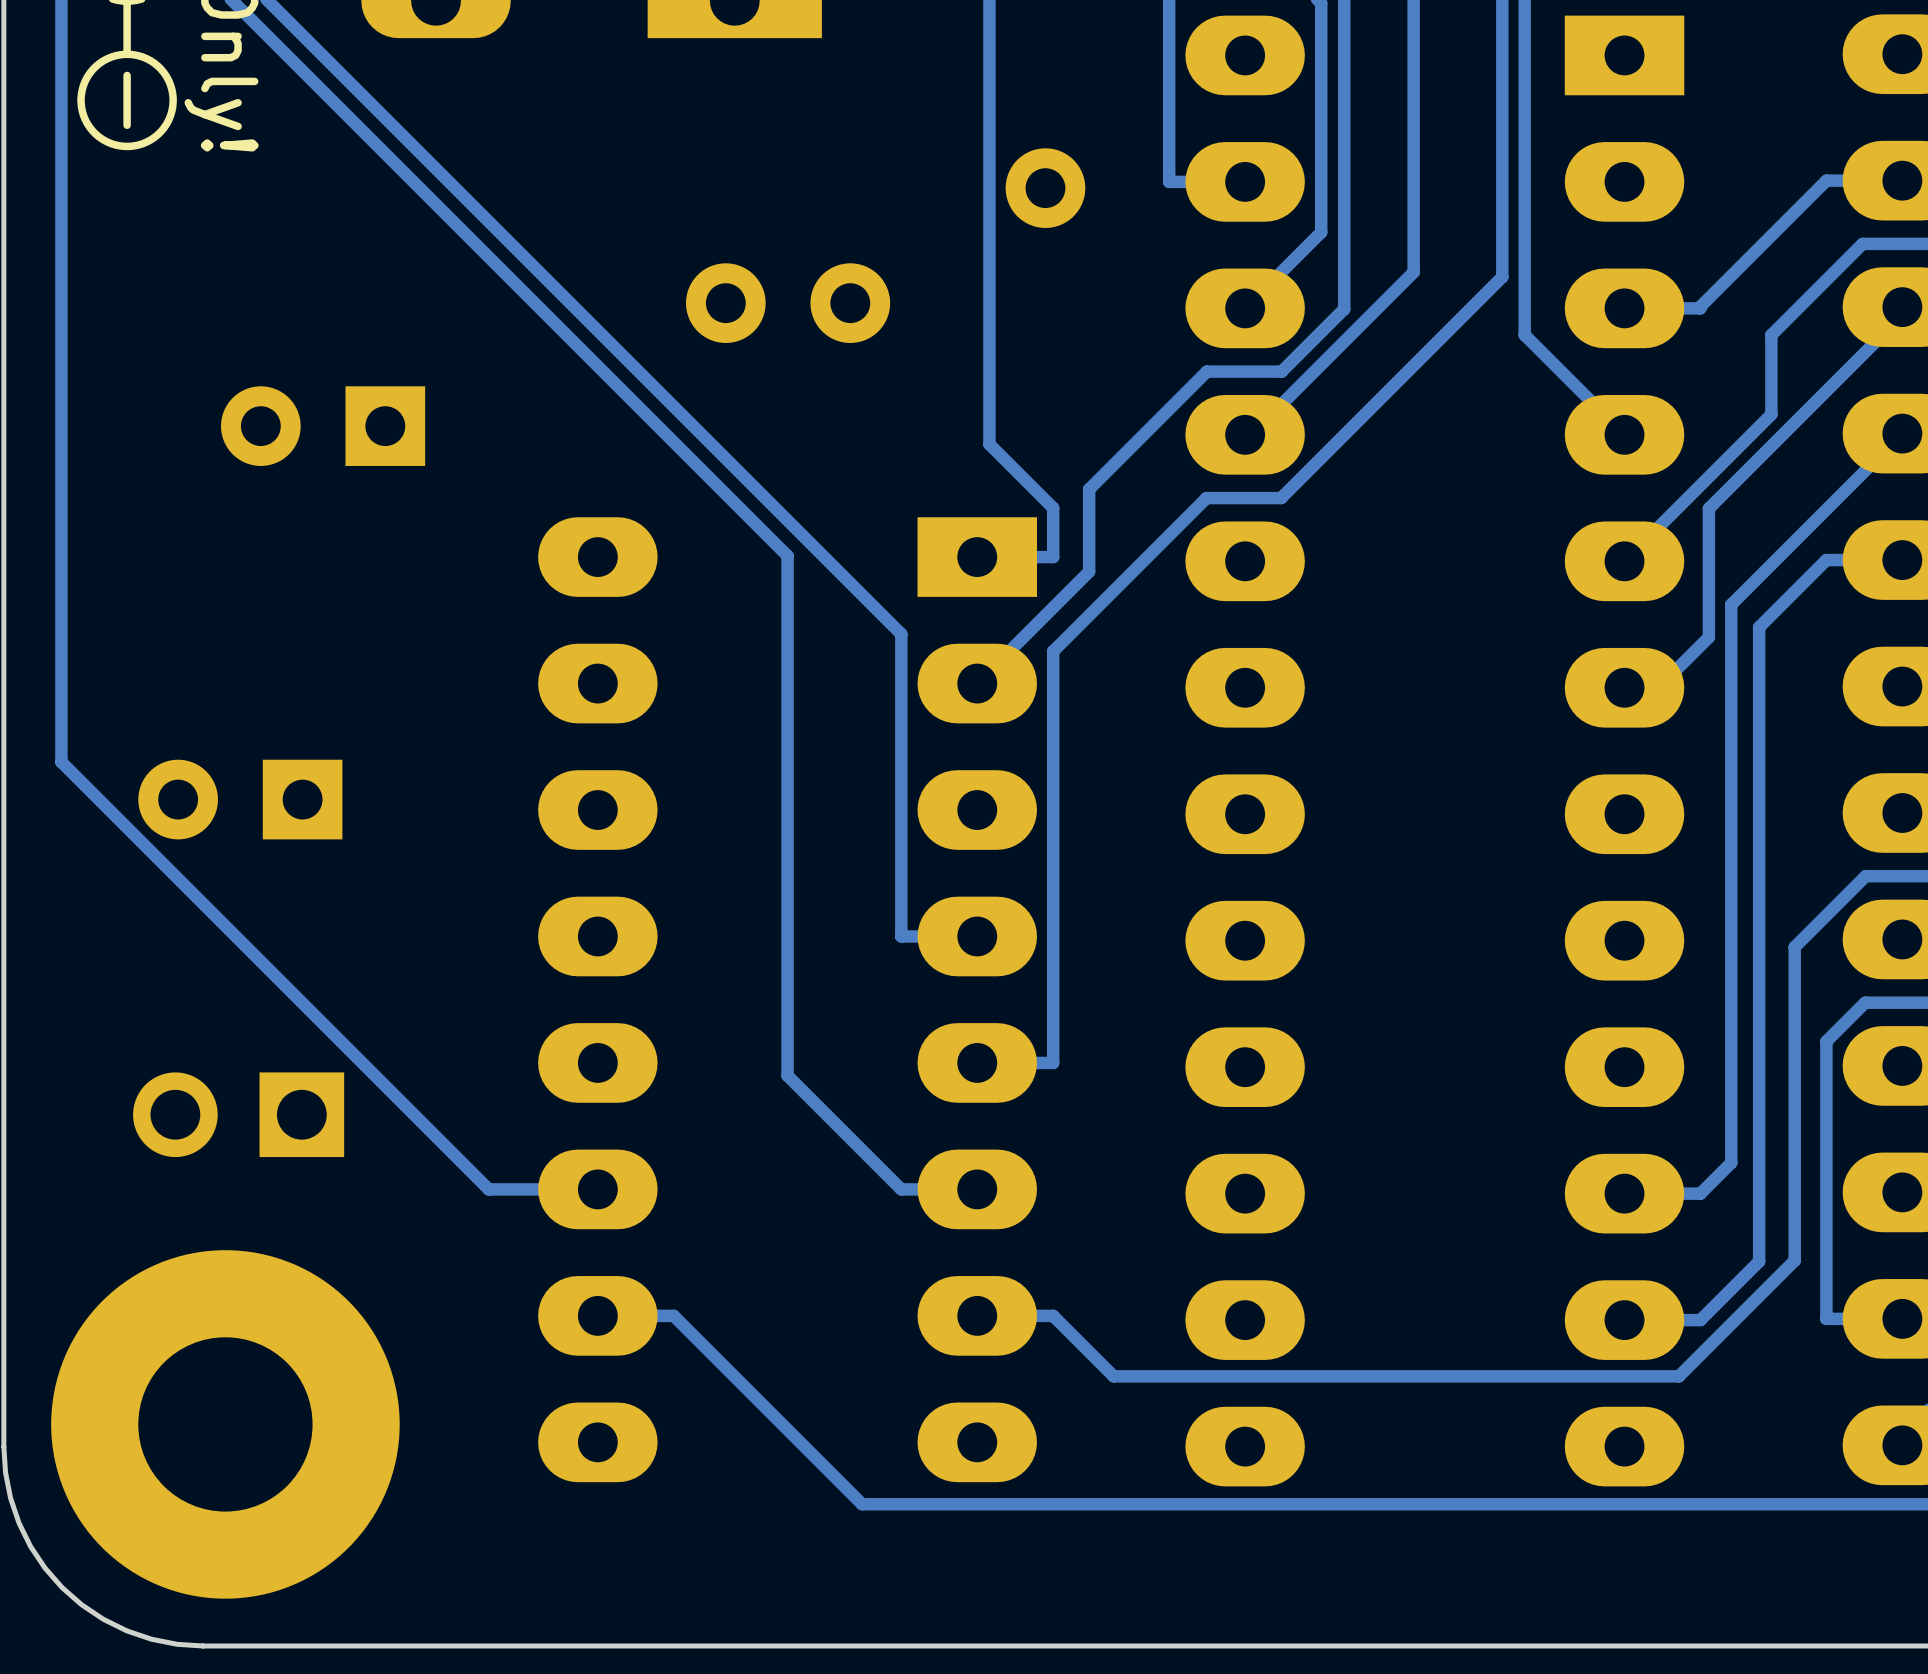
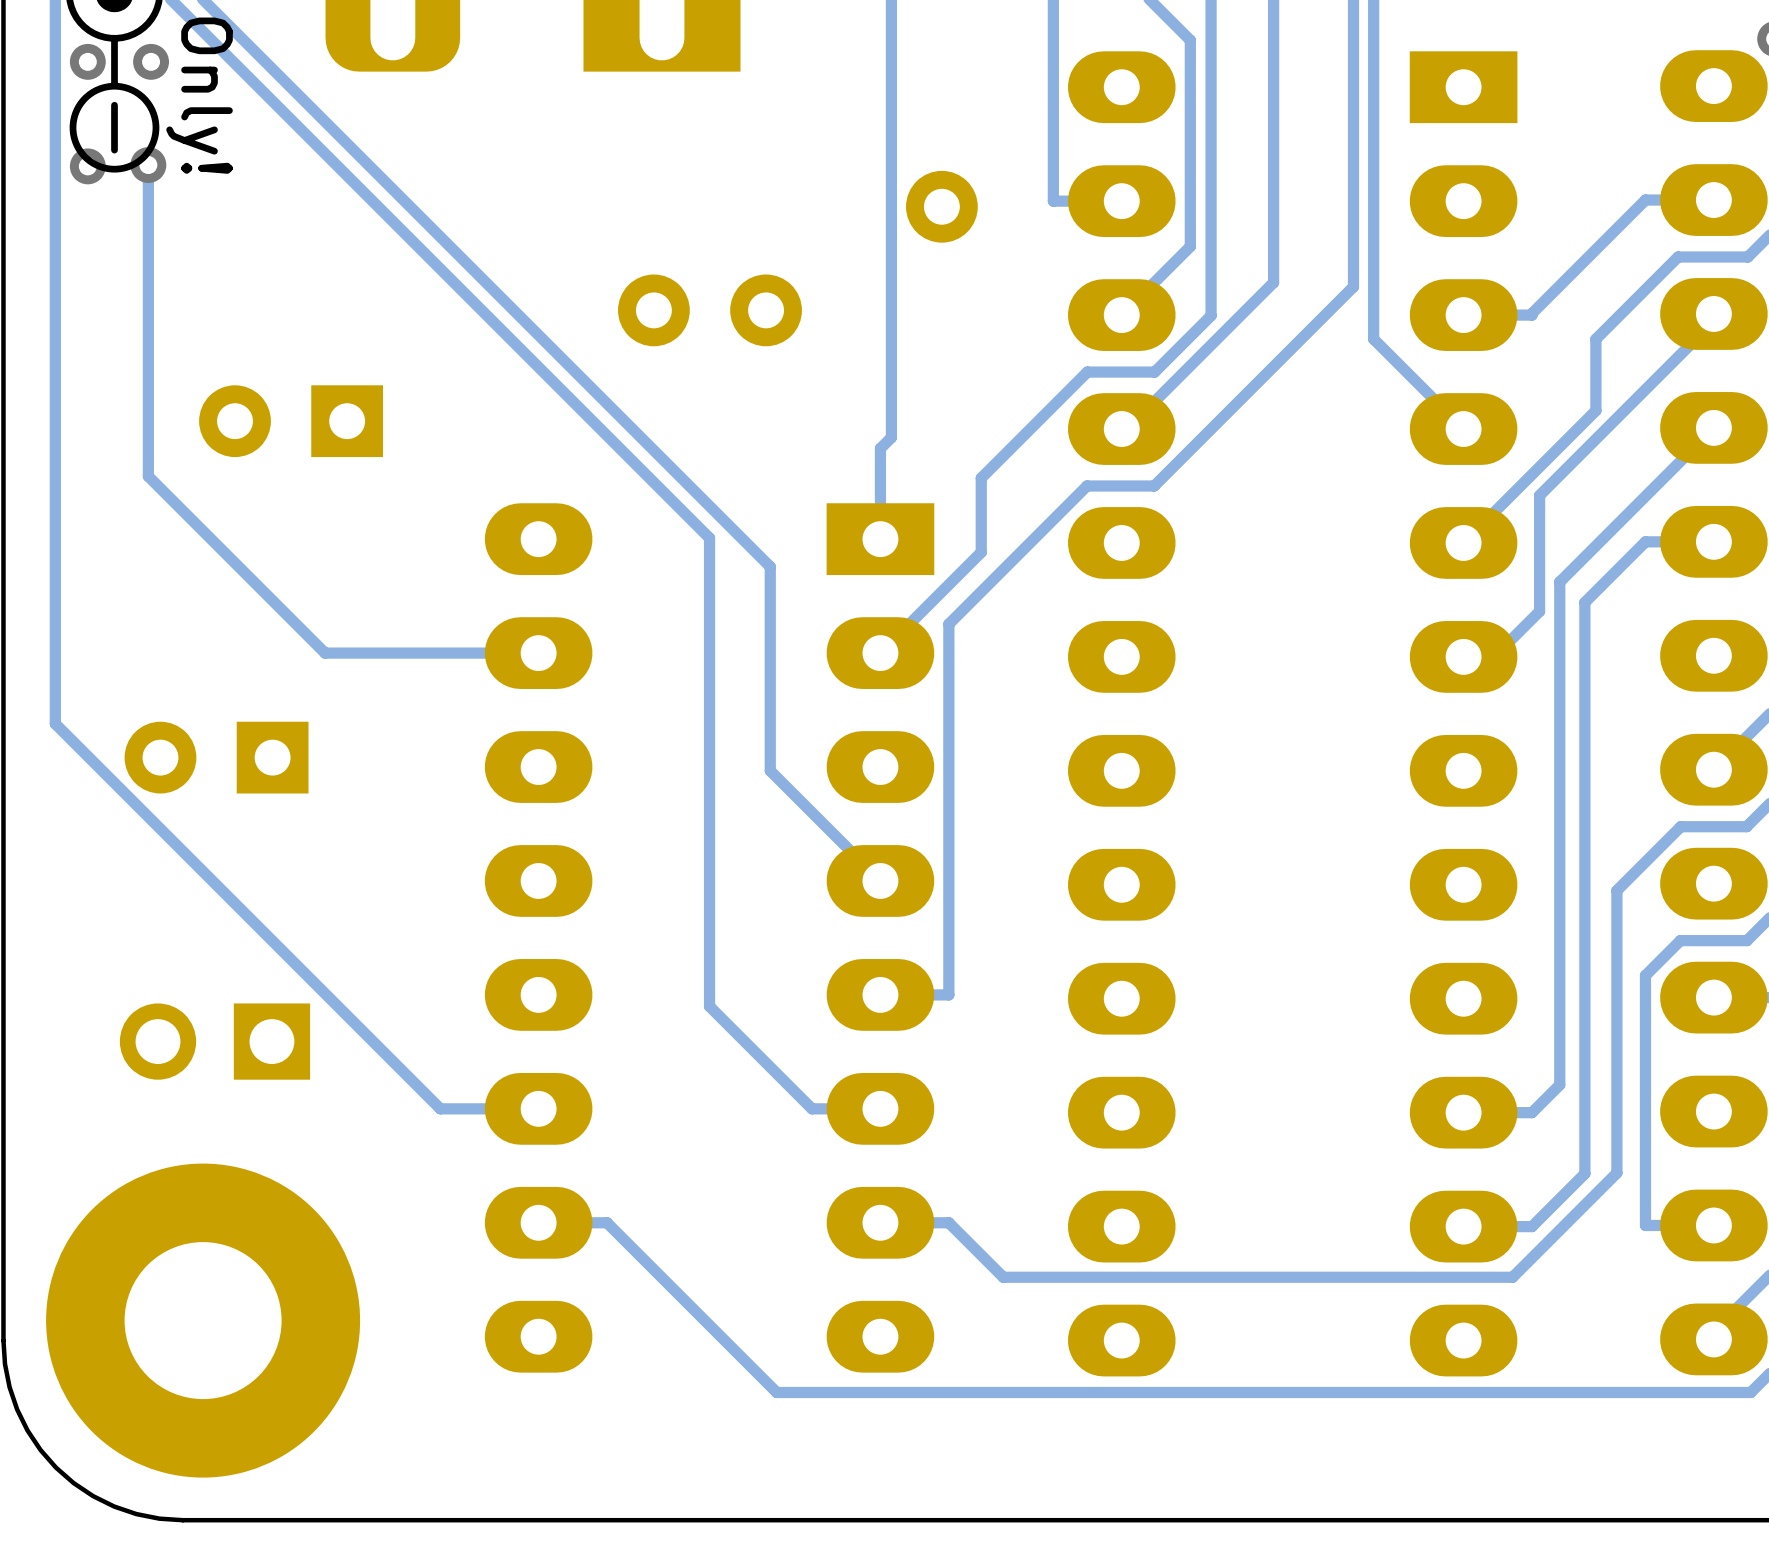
via: none -> (87, 61)
via: none -> (151, 61)
track: none -> (148, 165) (148, 476) (325, 653) (538, 653)
via: none -> (148, 165)
via: none -> (87, 166)
track: (989, 444) (1053, 508) (1053, 557) (977, 557) -> (891, 437) (880, 448) (880, 539)
track: (854, 587) (901, 634) (901, 936) (977, 936) -> (770, 566) (770, 770) (880, 880)

